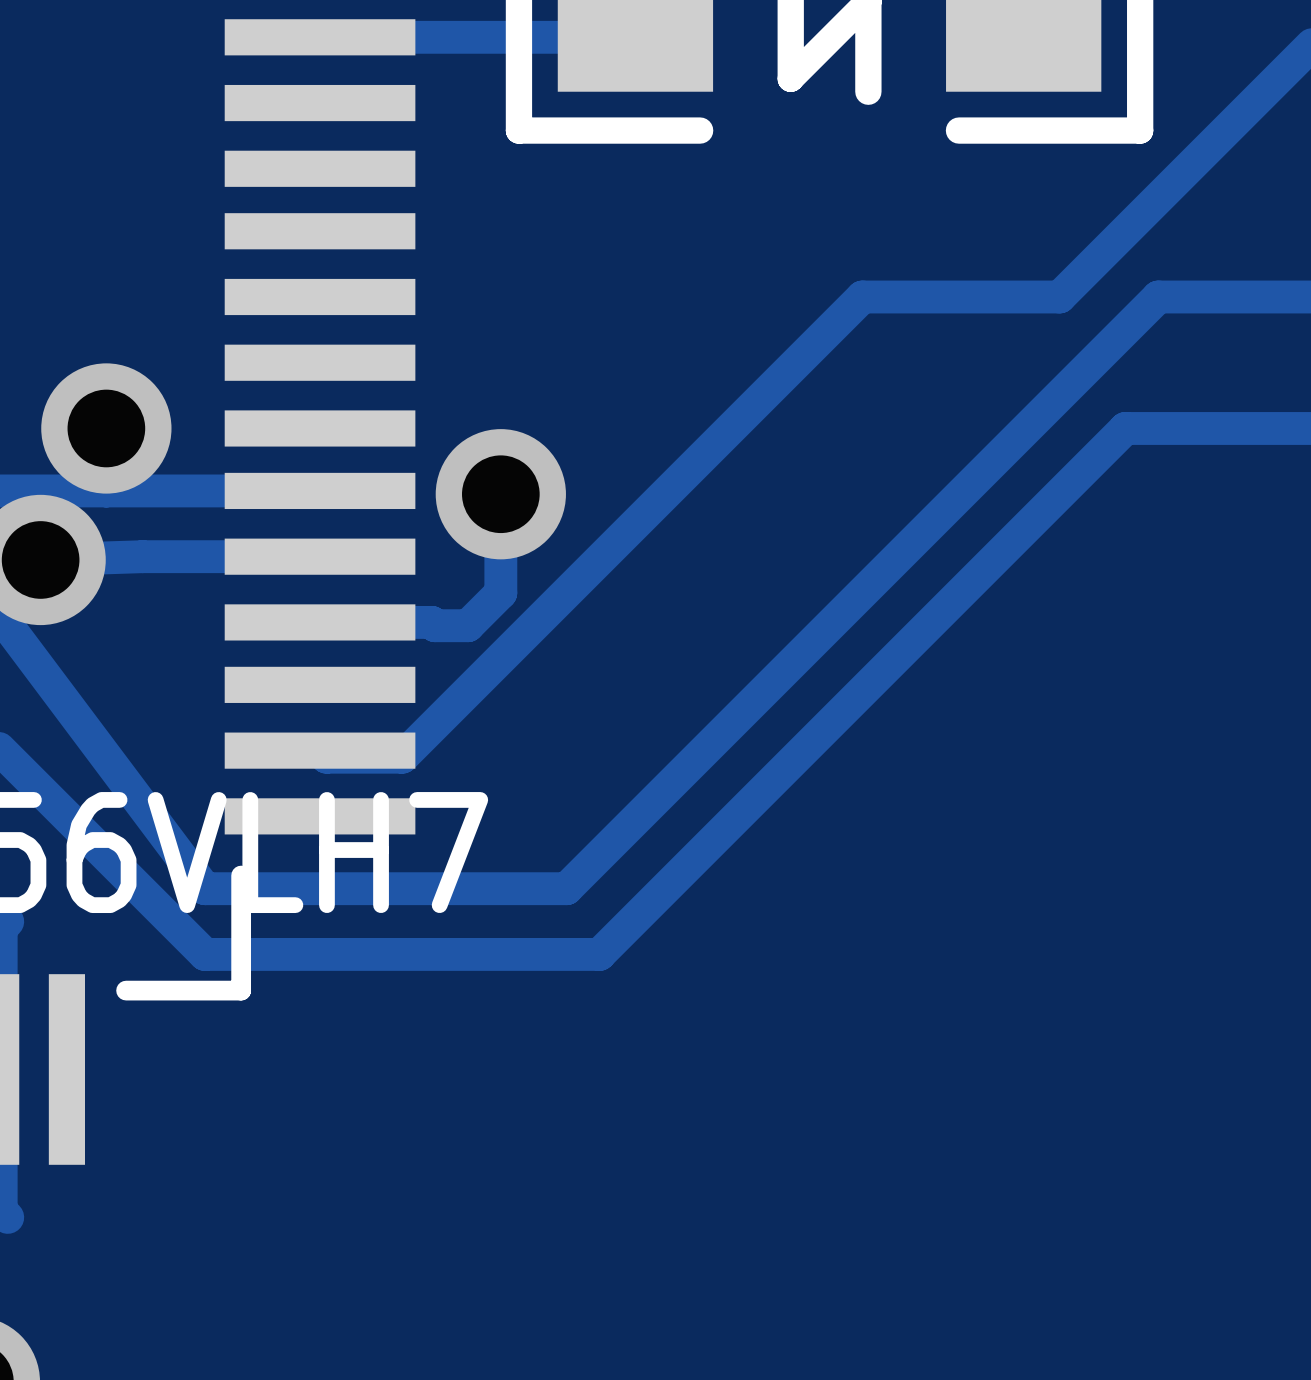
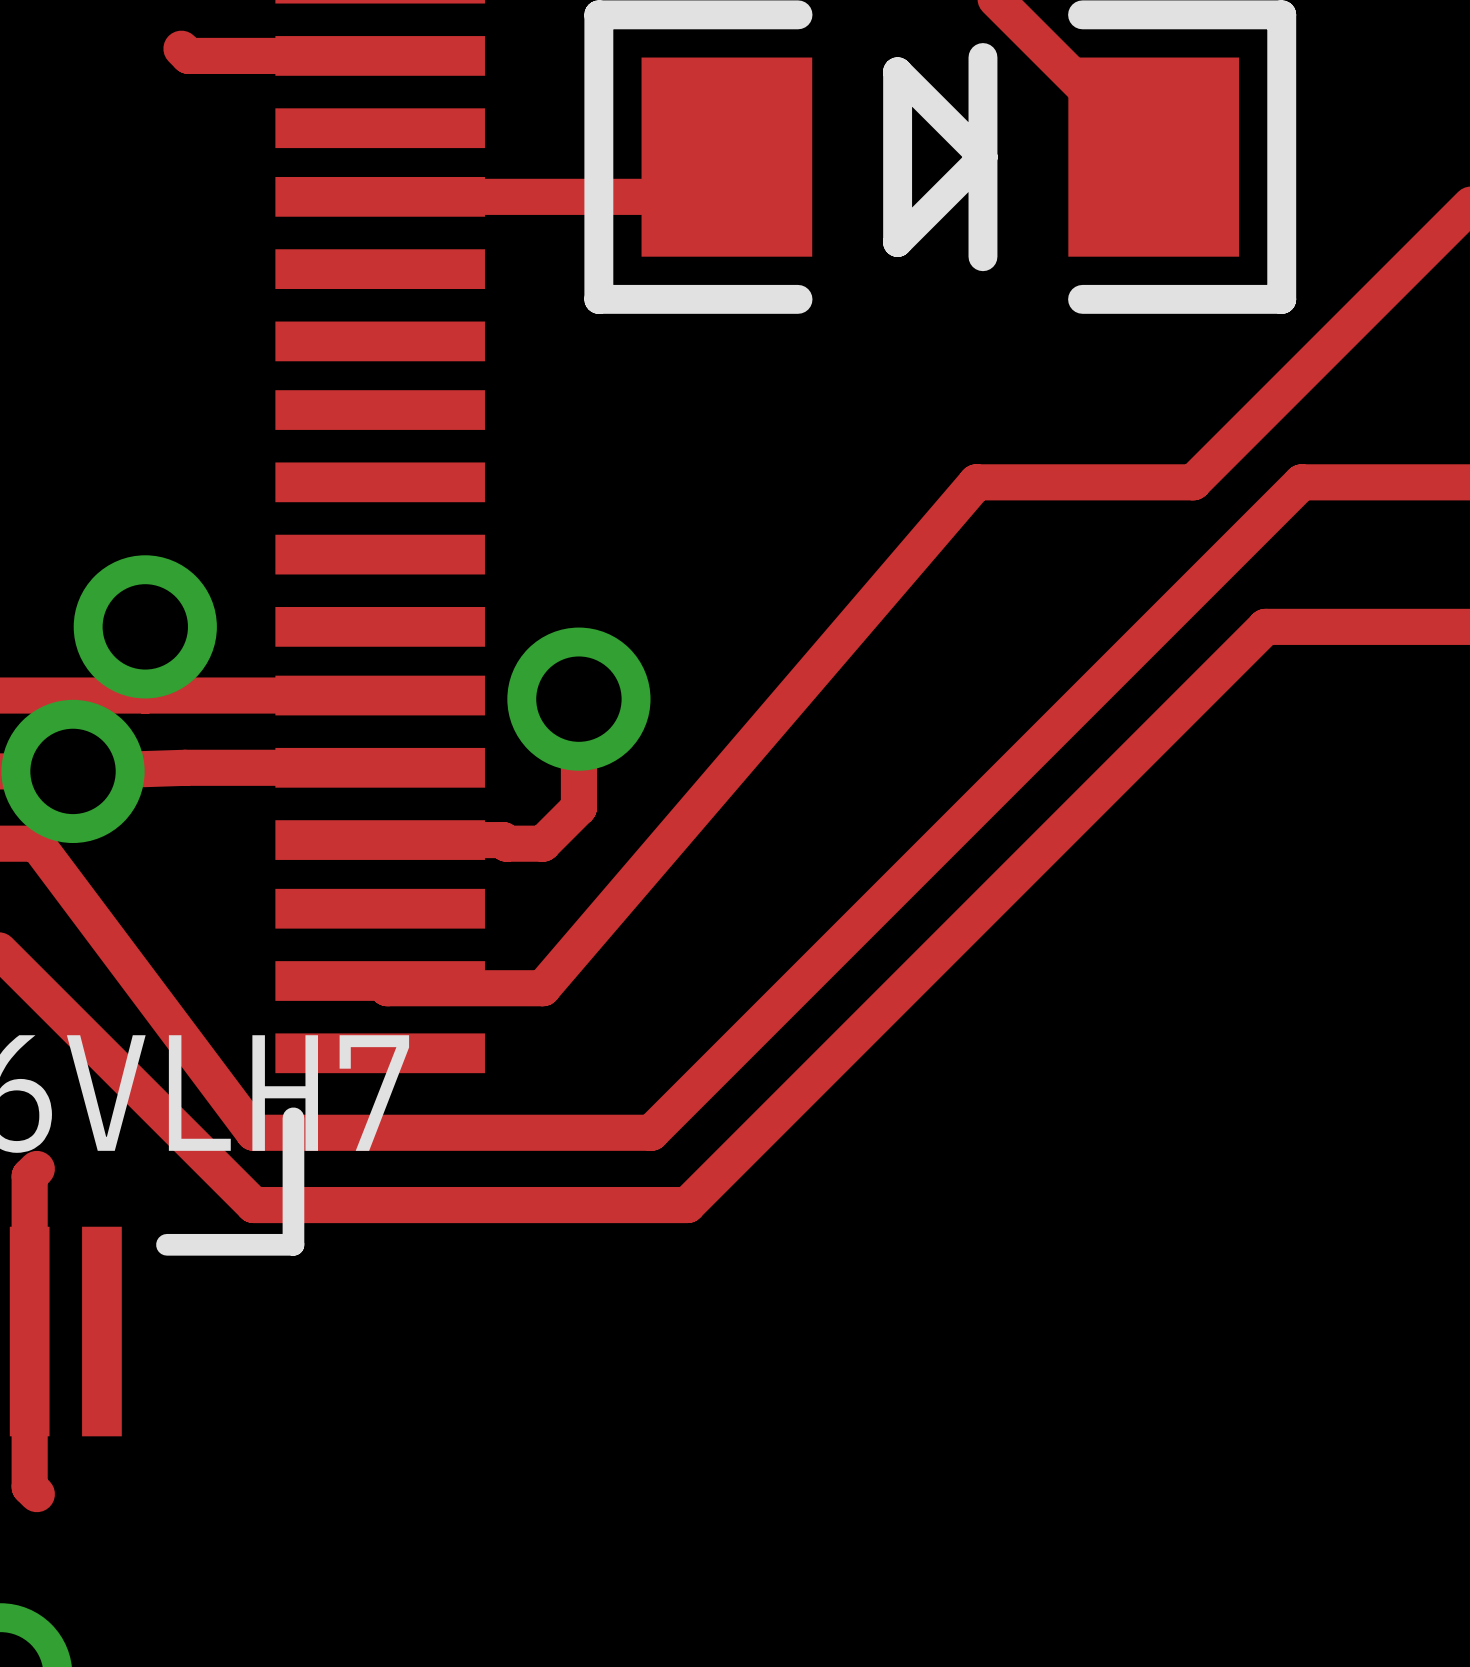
track: (862, 296) (402, 757) -> (976, 482) (542, 988) (470, 988)

